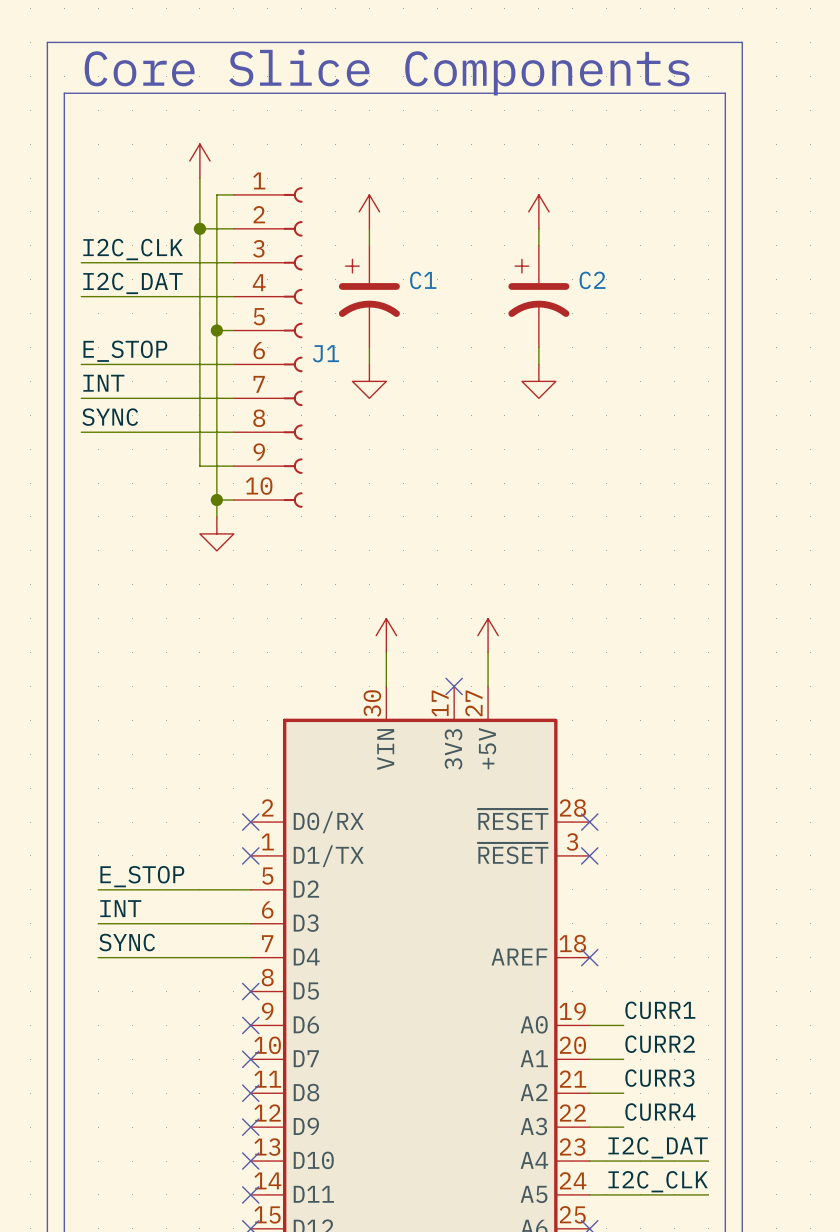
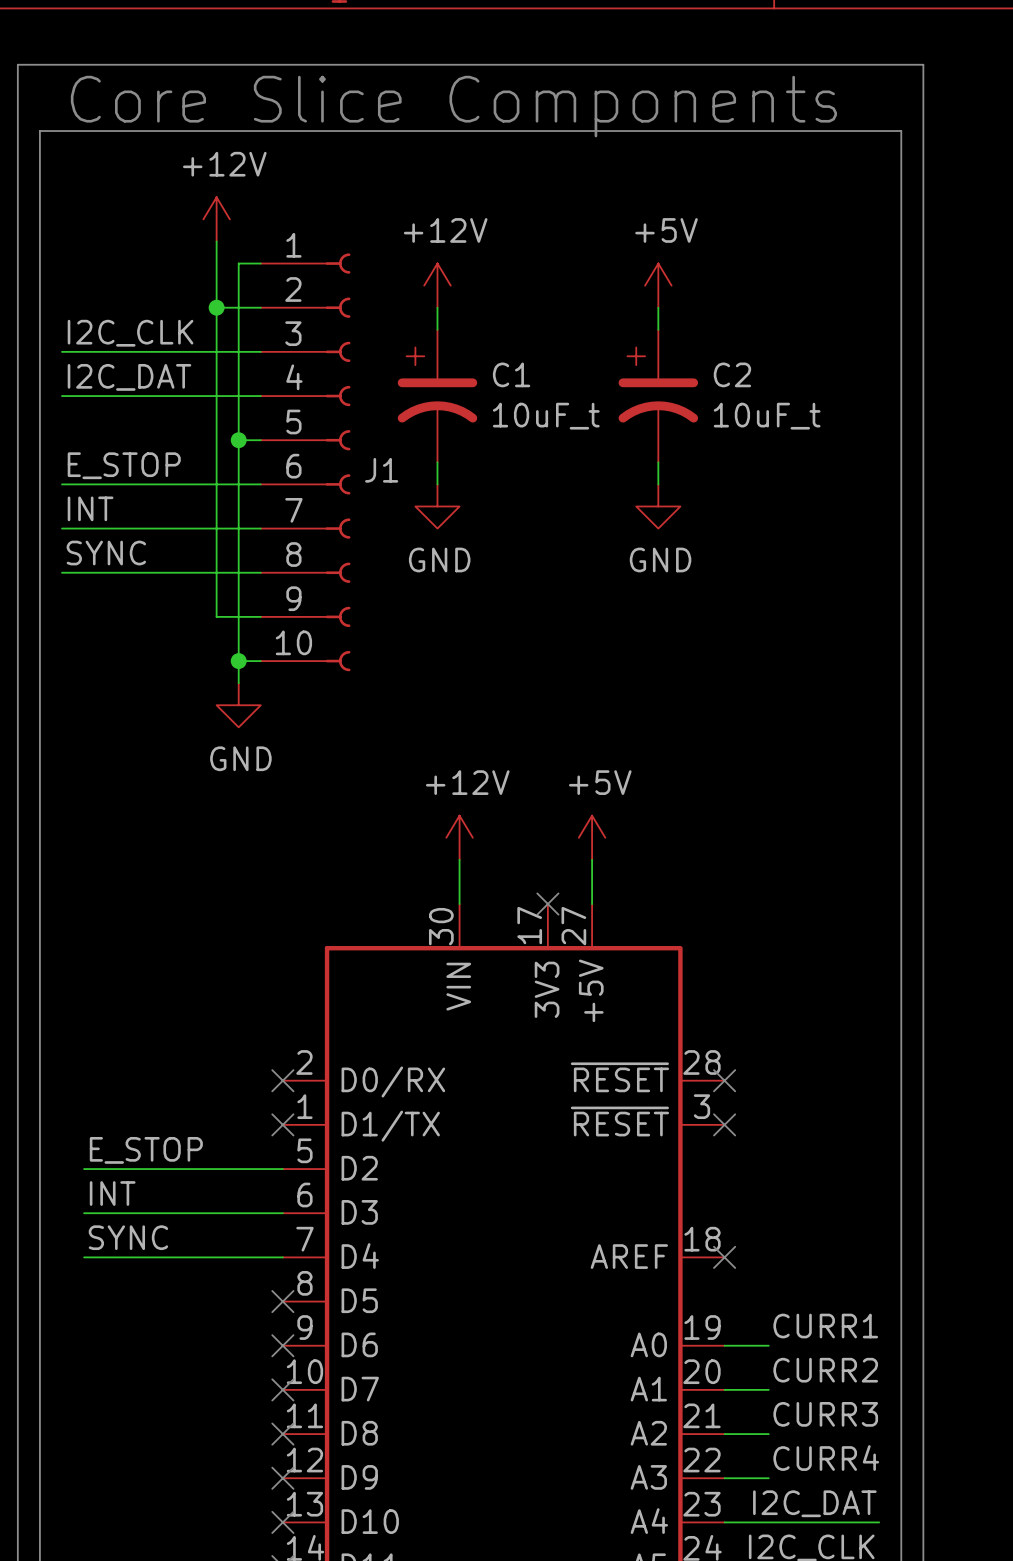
power symbol text: none -> +12V (224, 164)
power symbol text: none -> +12V (445, 230)
power symbol text: none -> +5V (666, 230)
C1 value: none -> 10uF_t (546, 416)
C2 value: none -> 10uF_t (767, 416)
power symbol text: none -> GND (439, 559)
power symbol text: none -> GND (660, 559)
power symbol text: none -> GND (240, 758)
power symbol text: none -> +12V (467, 782)
power symbol text: none -> +5V (600, 782)

